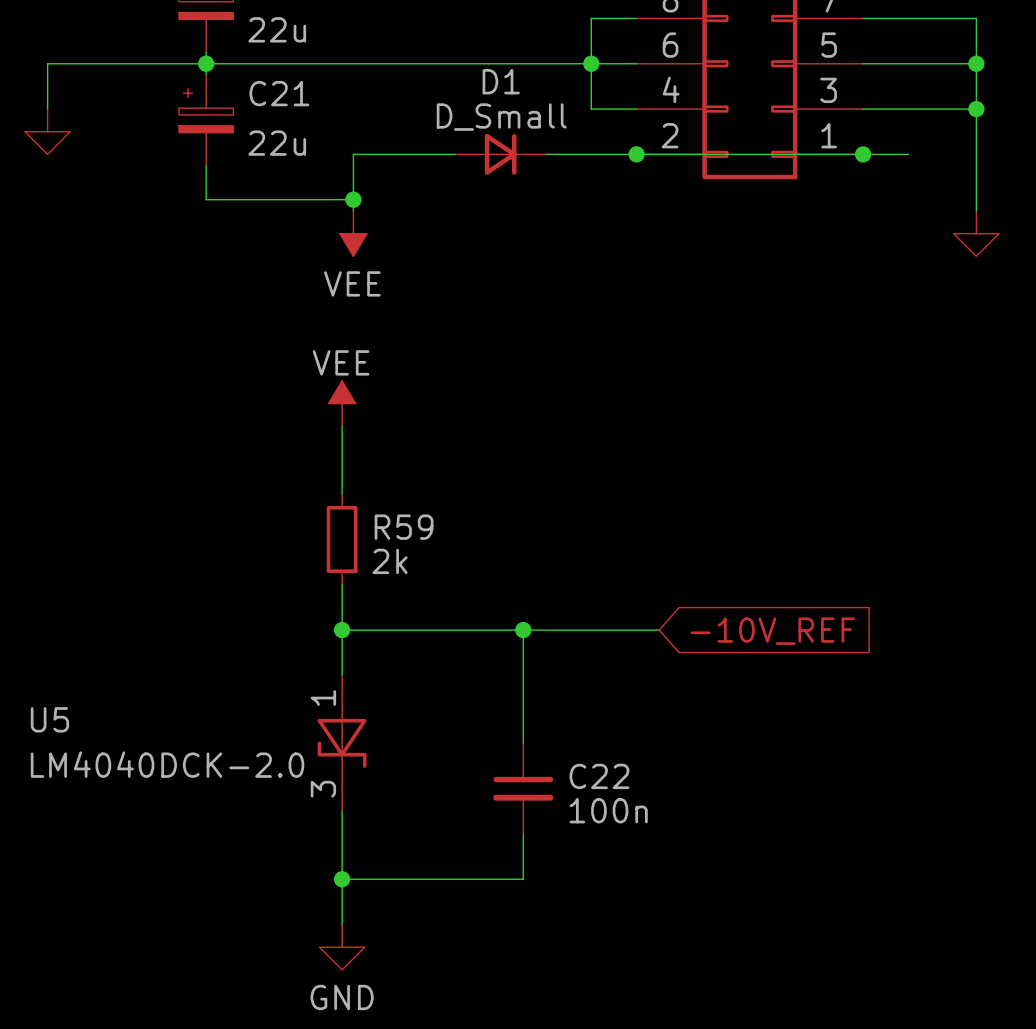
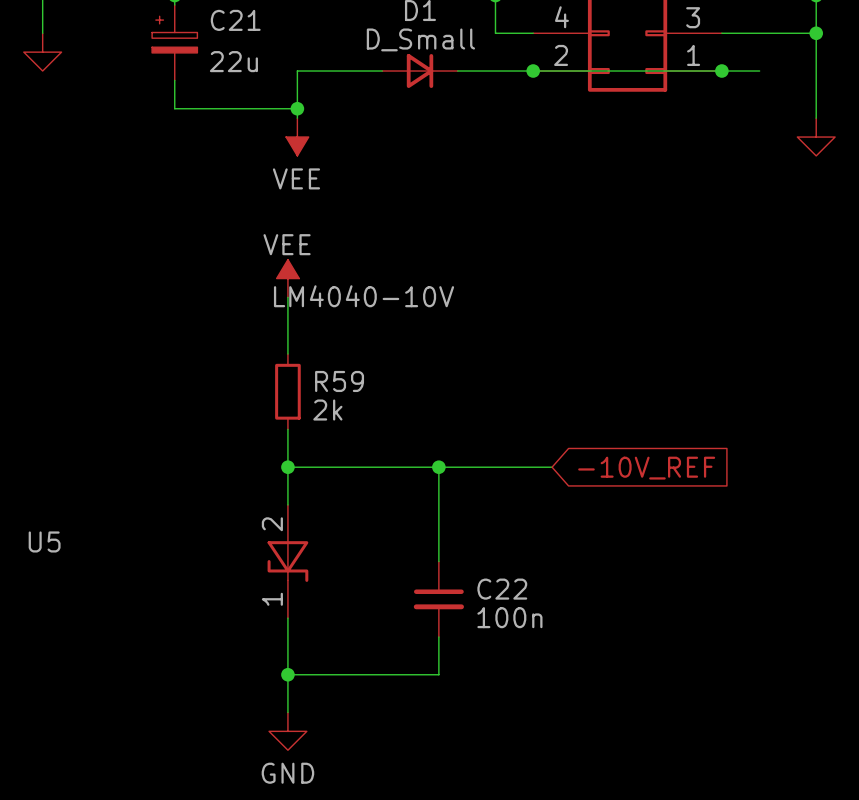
U5 pin number: 1 (323, 698) -> 2 (272, 524)
U5 value: LM4040DCK-2.0 (167, 764) -> LM4040-10V (364, 296)
U5 pin number: 3 (323, 789) -> 1 (272, 599)

